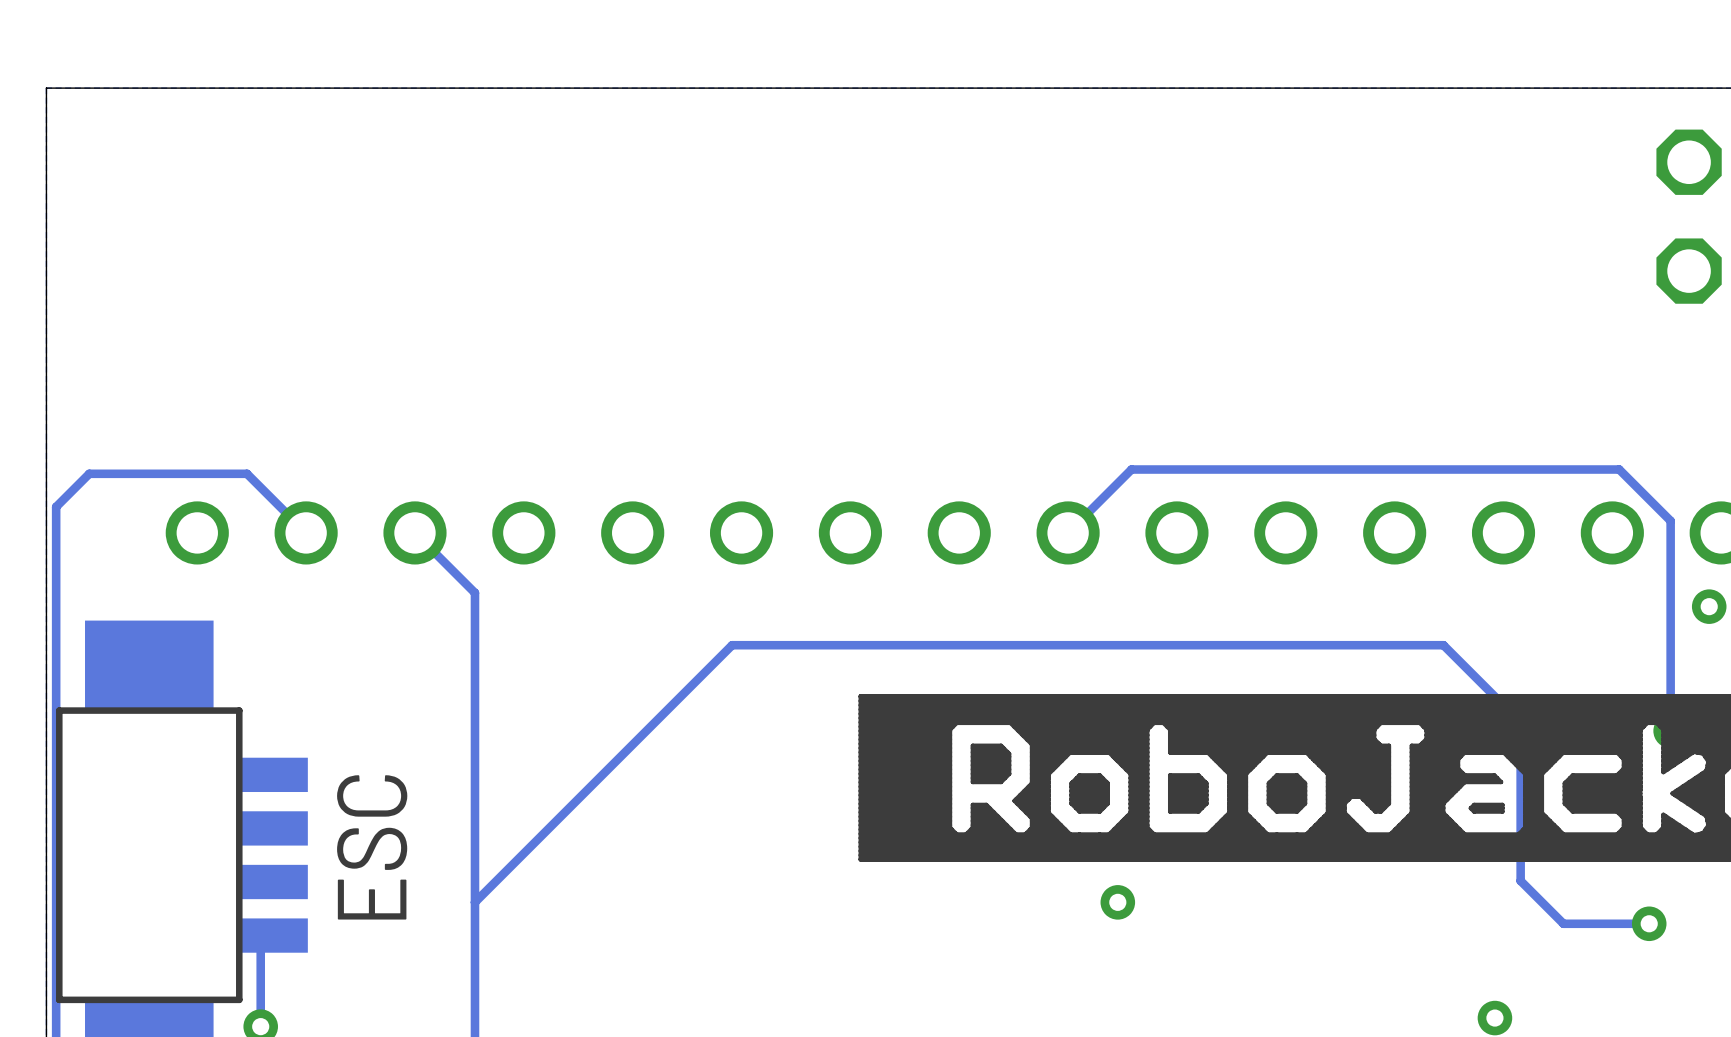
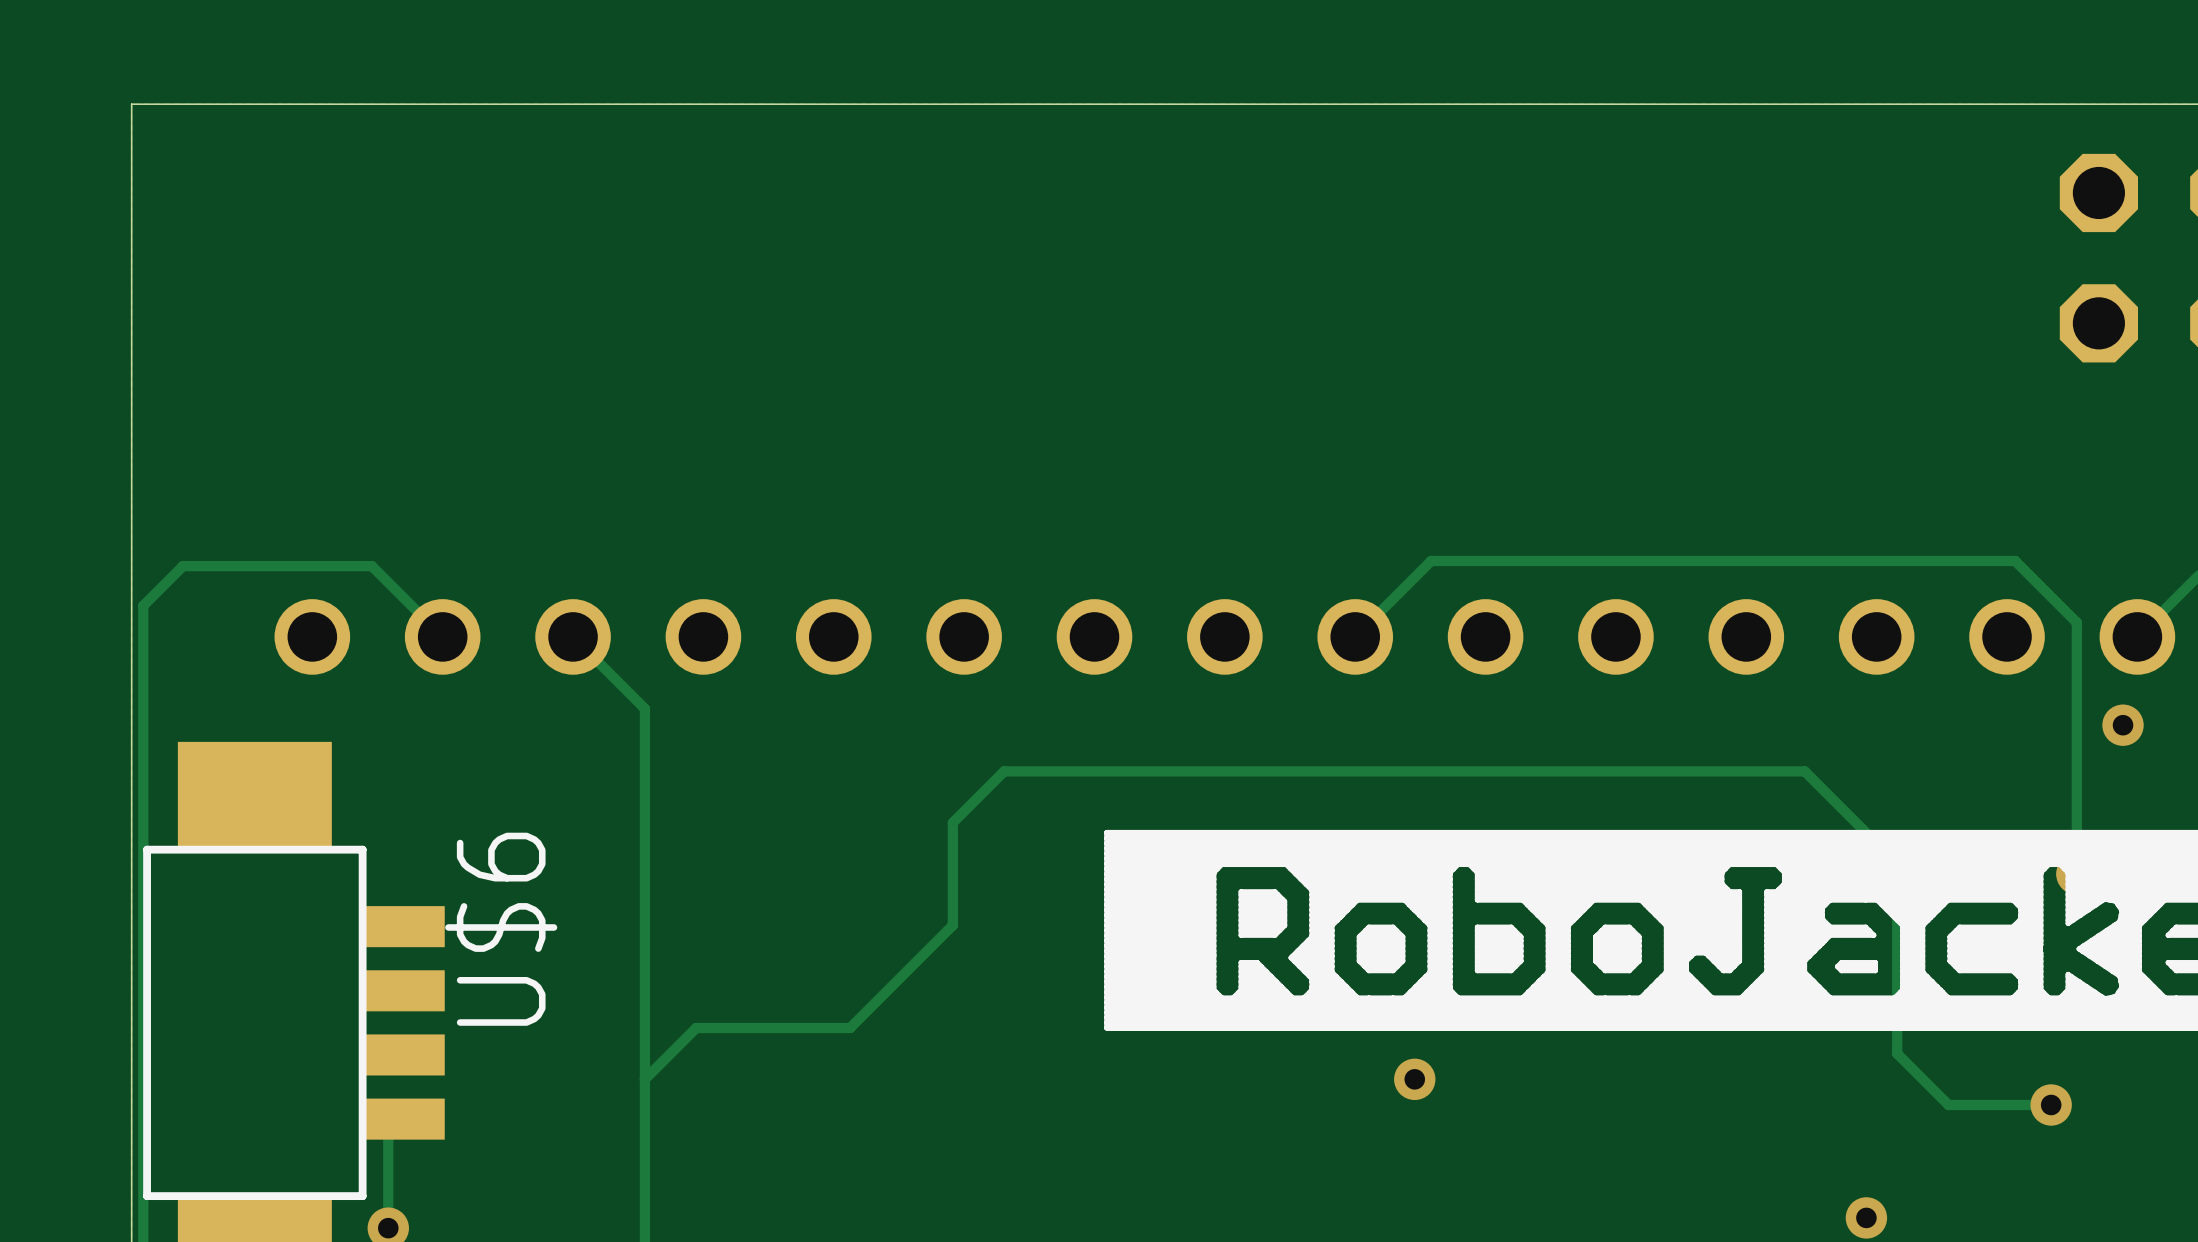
track: (774, 645) (732, 645) (517, 859) -> (1004, 771) (952, 822) (952, 925) (850, 1028) (696, 1028)
ESC name: ESC (372, 847) -> U$6 (501, 929)

